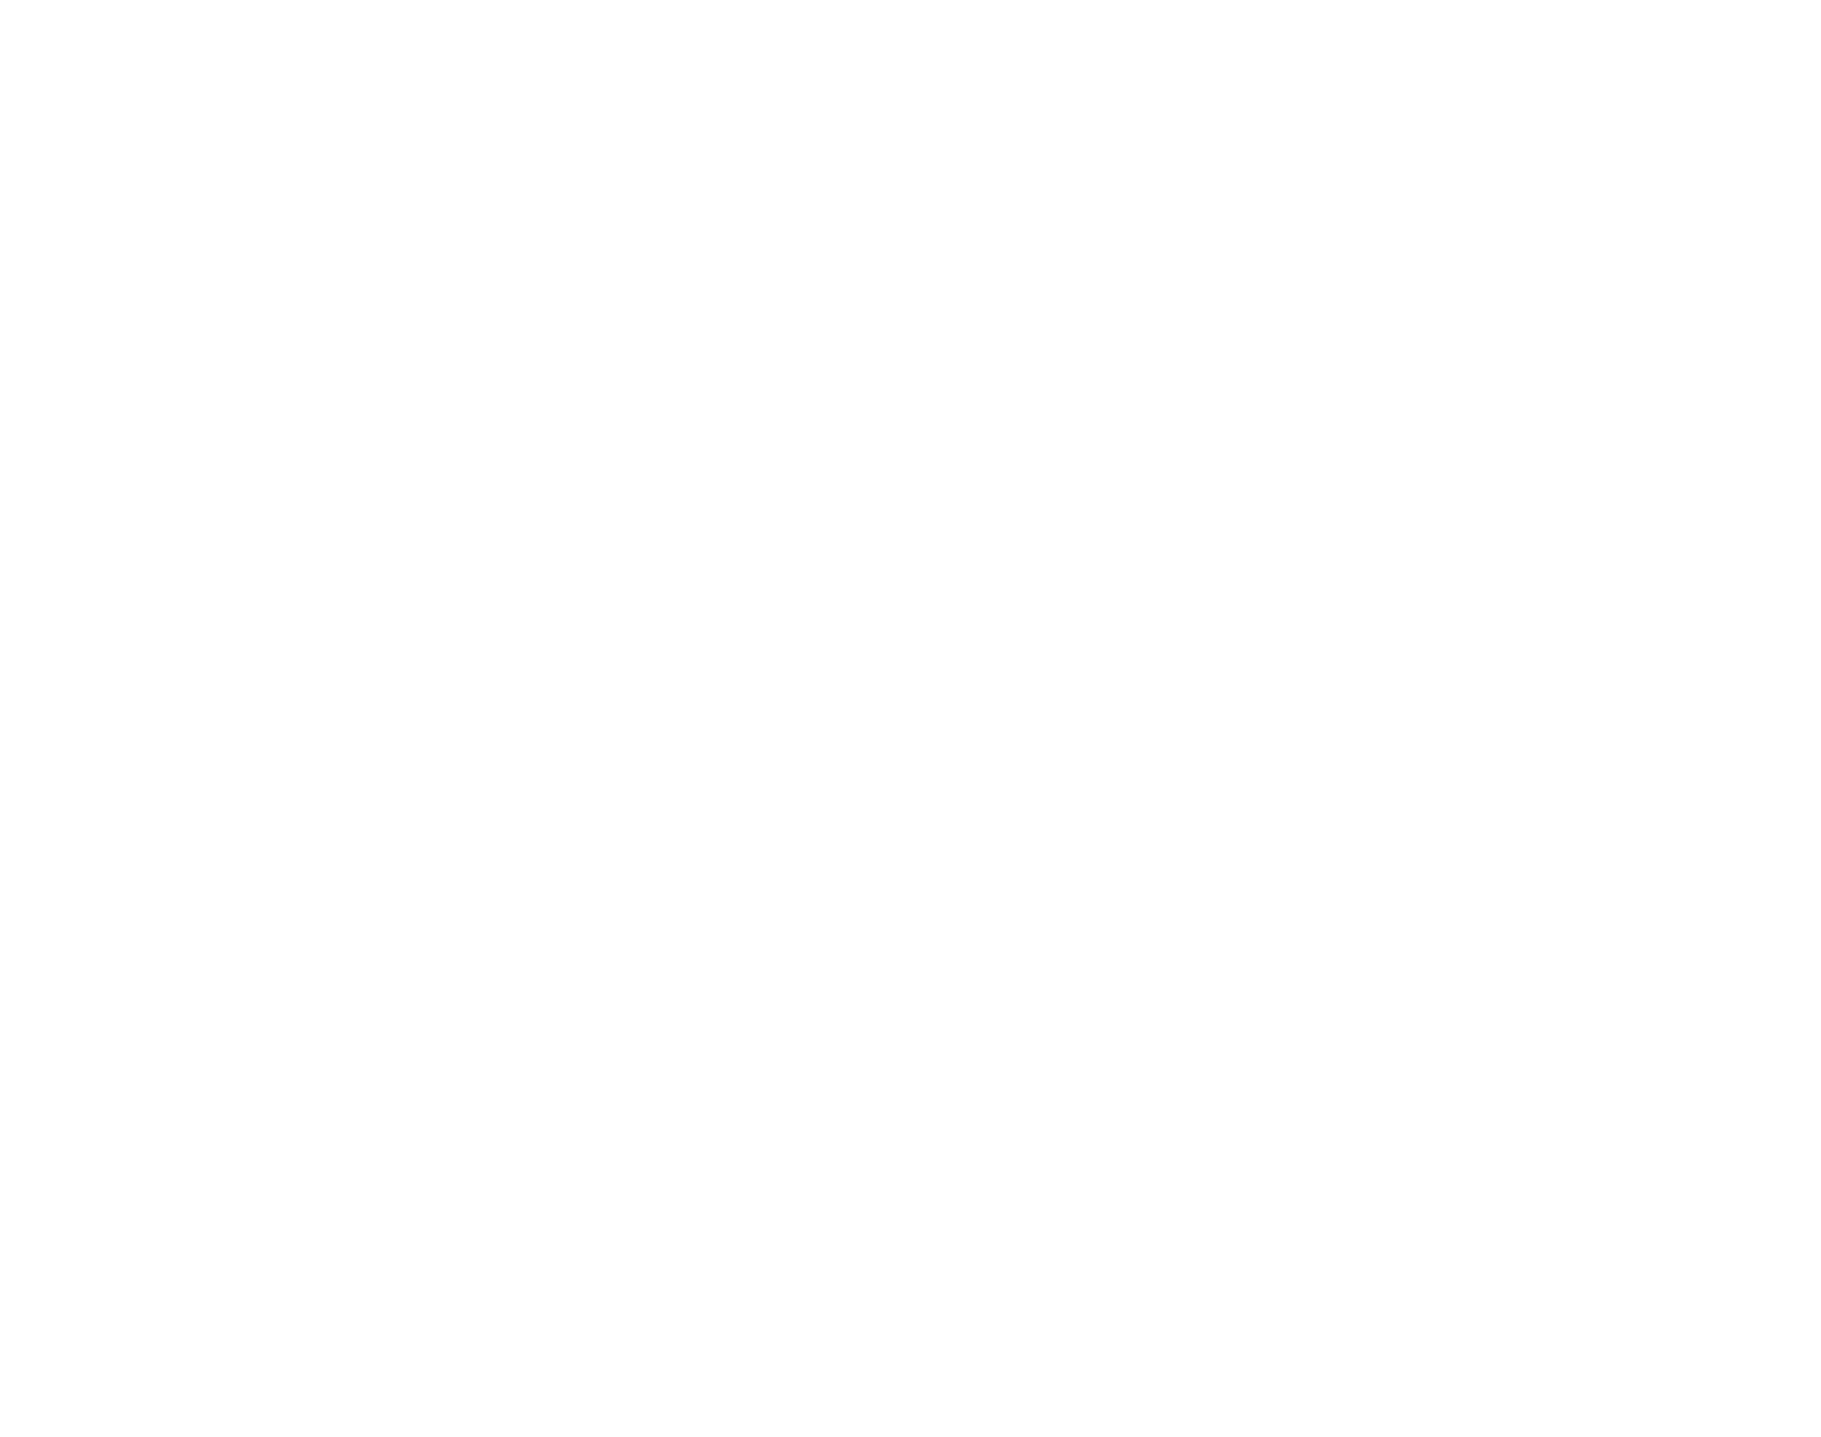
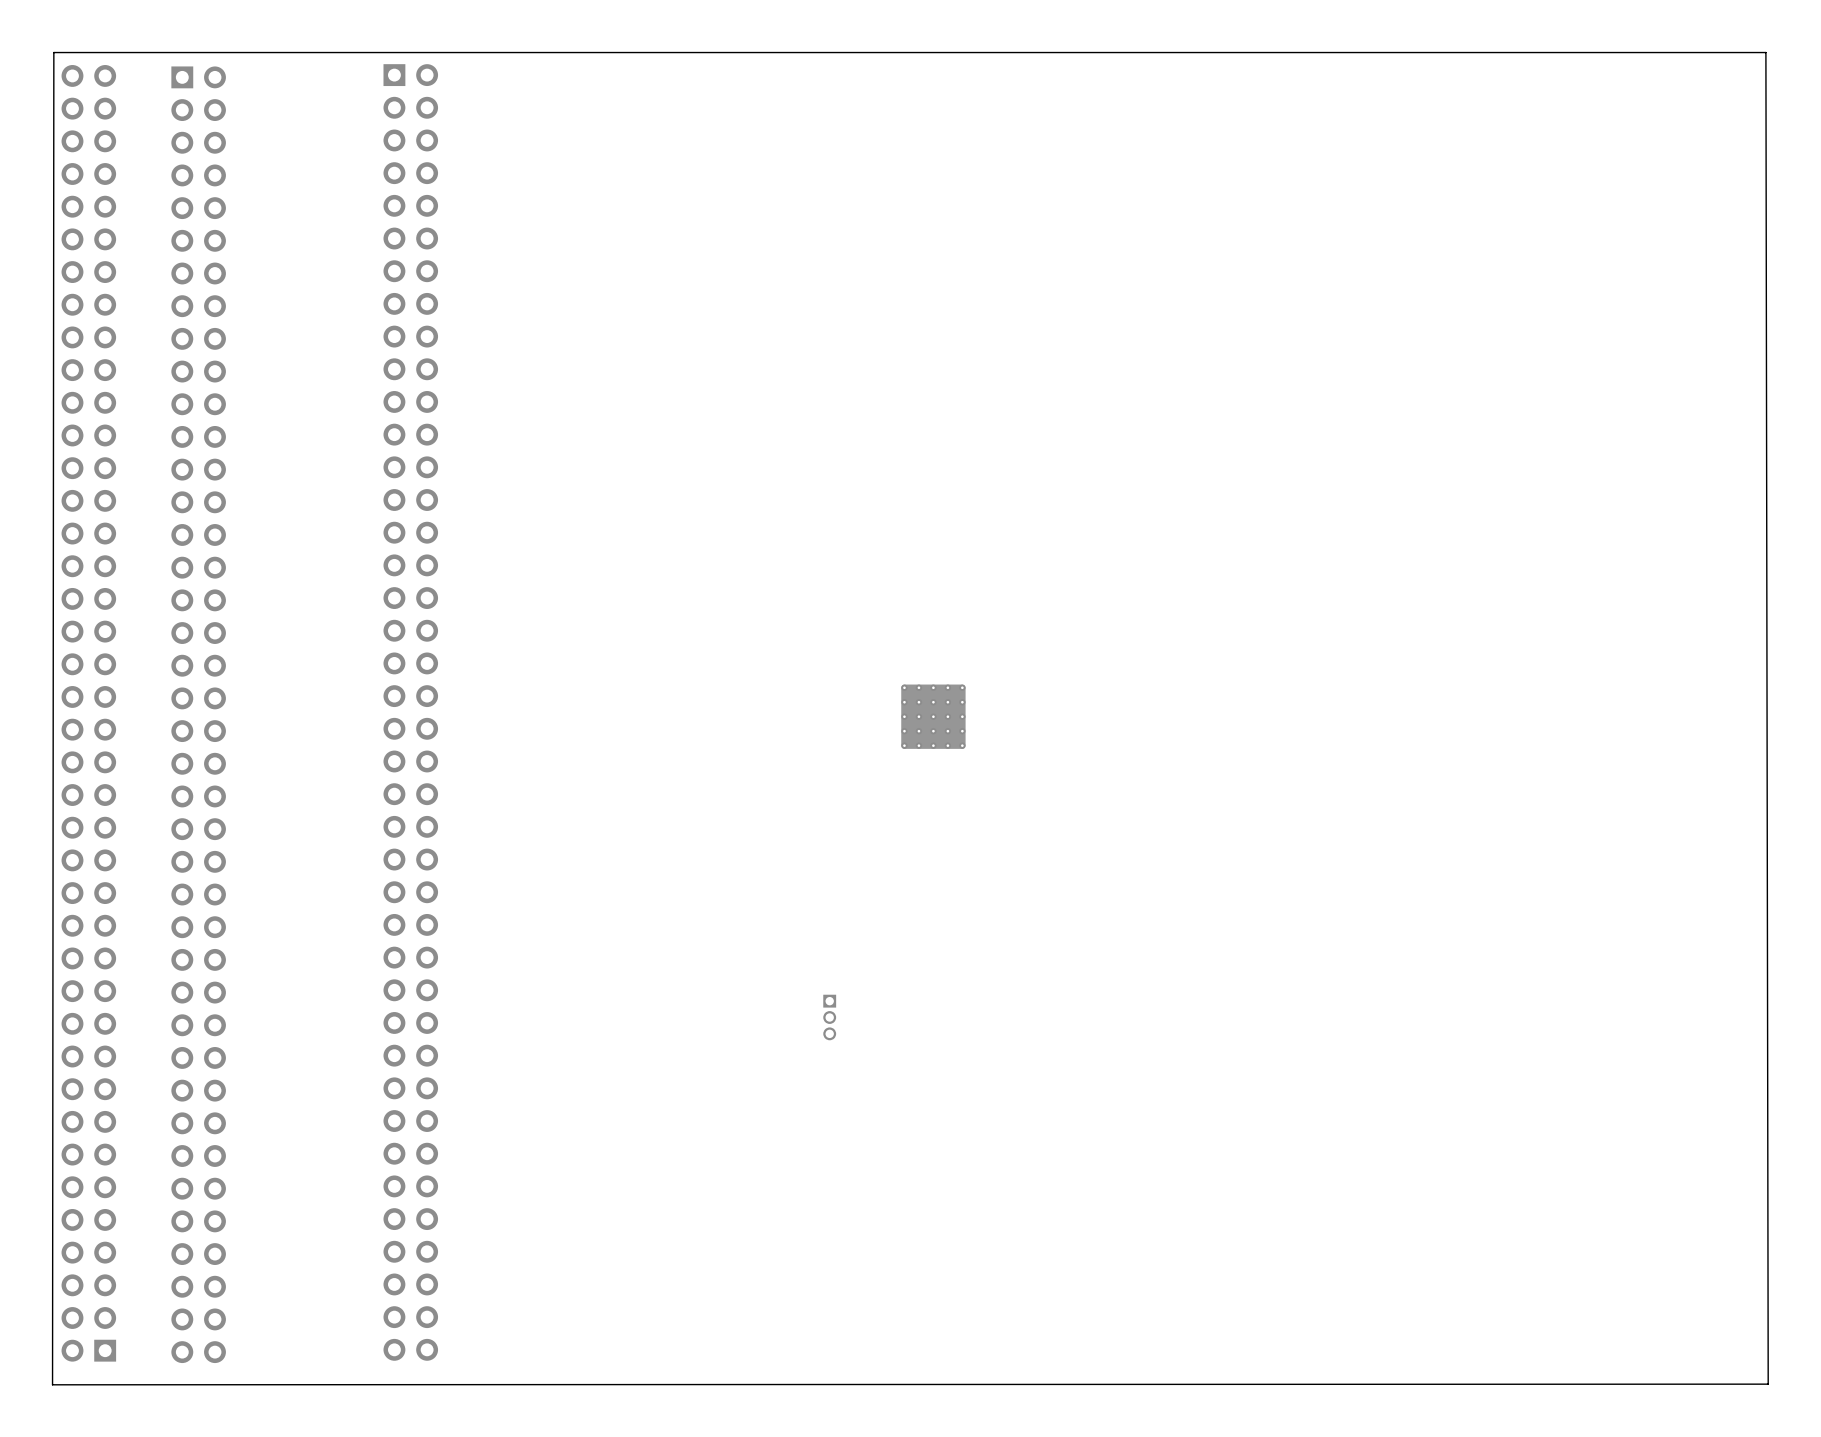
board edge: none -> (1765, 52) (53, 52) (52, 1384) (1768, 1384) (1765, 52)
part: none -> (410, 712)
part: none -> (88, 713)
part: none -> (198, 714)
part: none -> (933, 716)
part: none -> (829, 1017)

